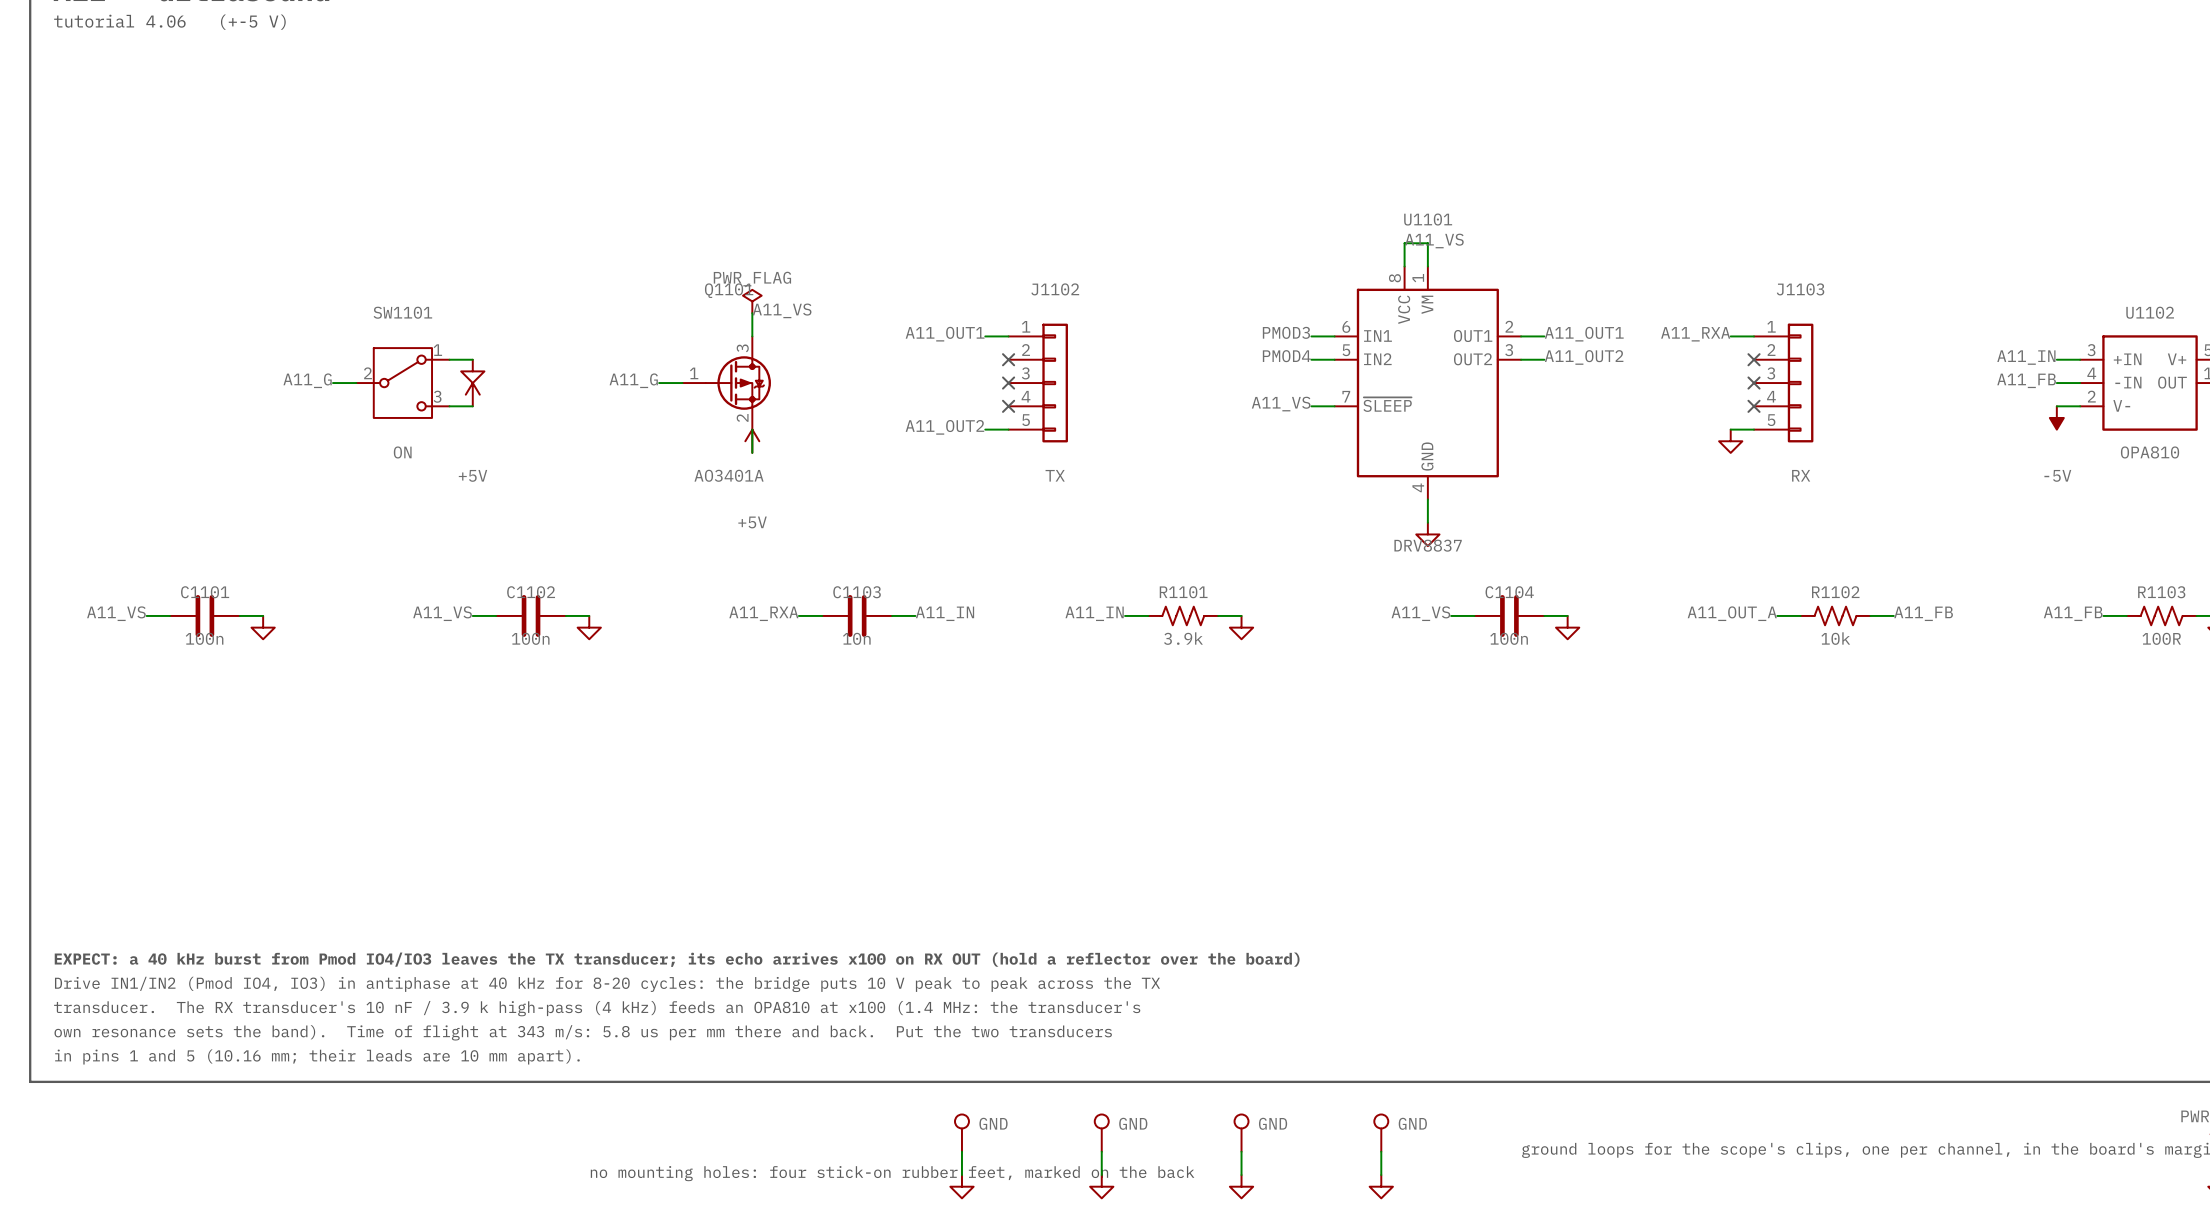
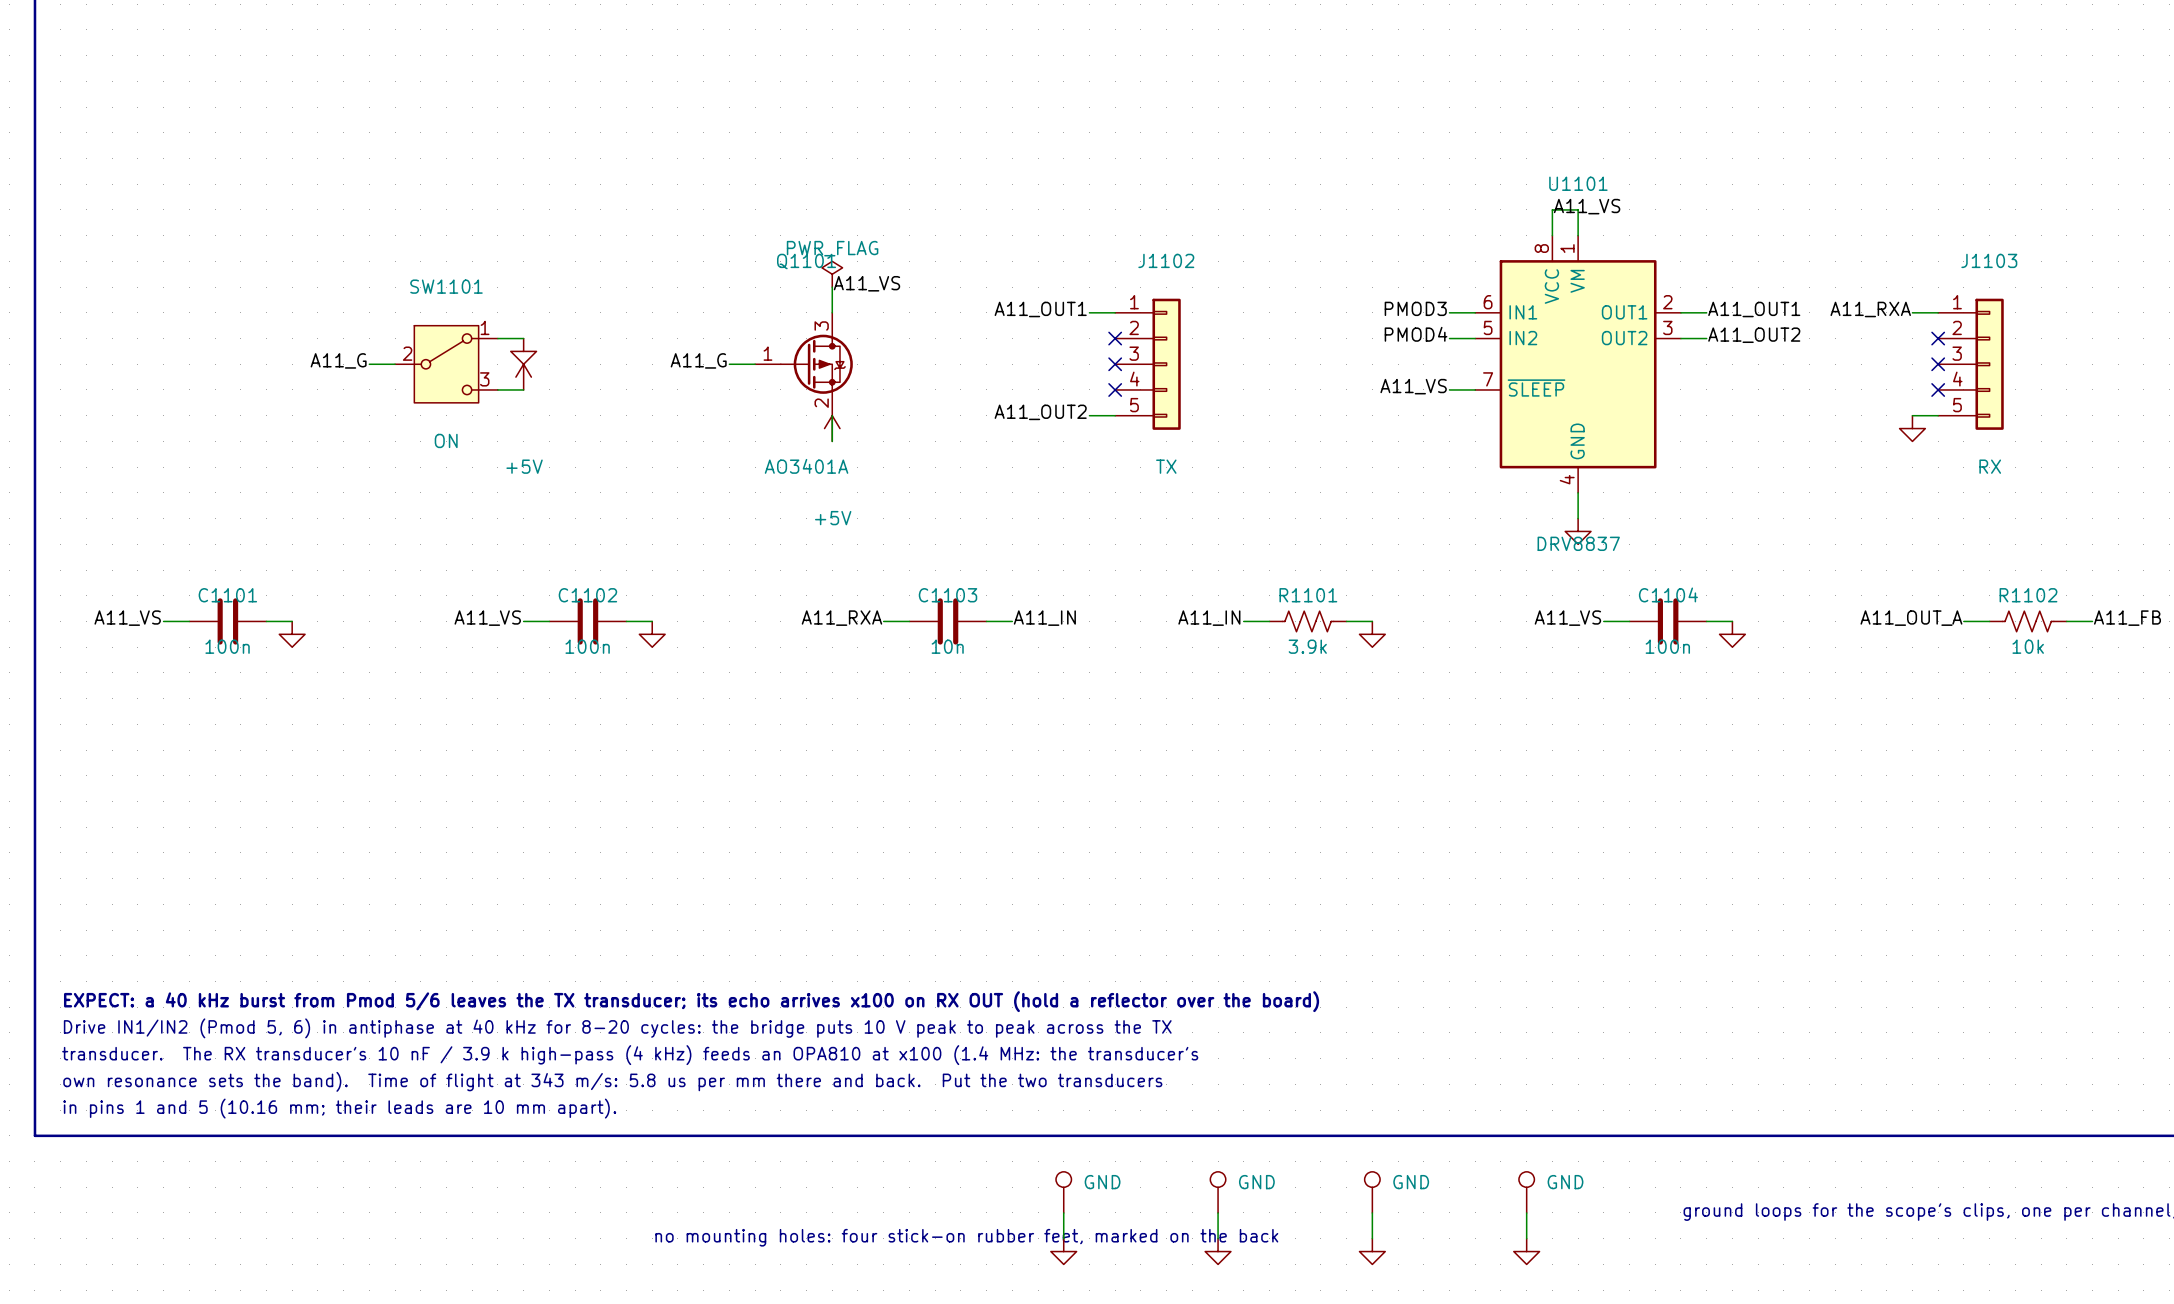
text: EXPECT: a 40 kHz burst from Pmod IO4/IO3 leaves the TX transducer; its echo arrives x100 on RX OUT (hold a reflector over the board) (677, 959) -> EXPECT: a 40 kHz burst from Pmod 5/6 leaves the TX transducer; its echo arrives x100 on RX OUT (hold a reflector over the board) (691, 1001)
text: Drive IN1/IN2 (Pmod IO4, IO3) in antiphase at 40 kHz for 8-20 cycles: the bridge puts 10 V peak to peak across the TX (607, 984) -> Drive IN1/IN2 (Pmod 5, 6) in antiphase at 40 kHz for 8-20 cycles: the bridge puts 10 V peak to peak across the TX (617, 1028)

